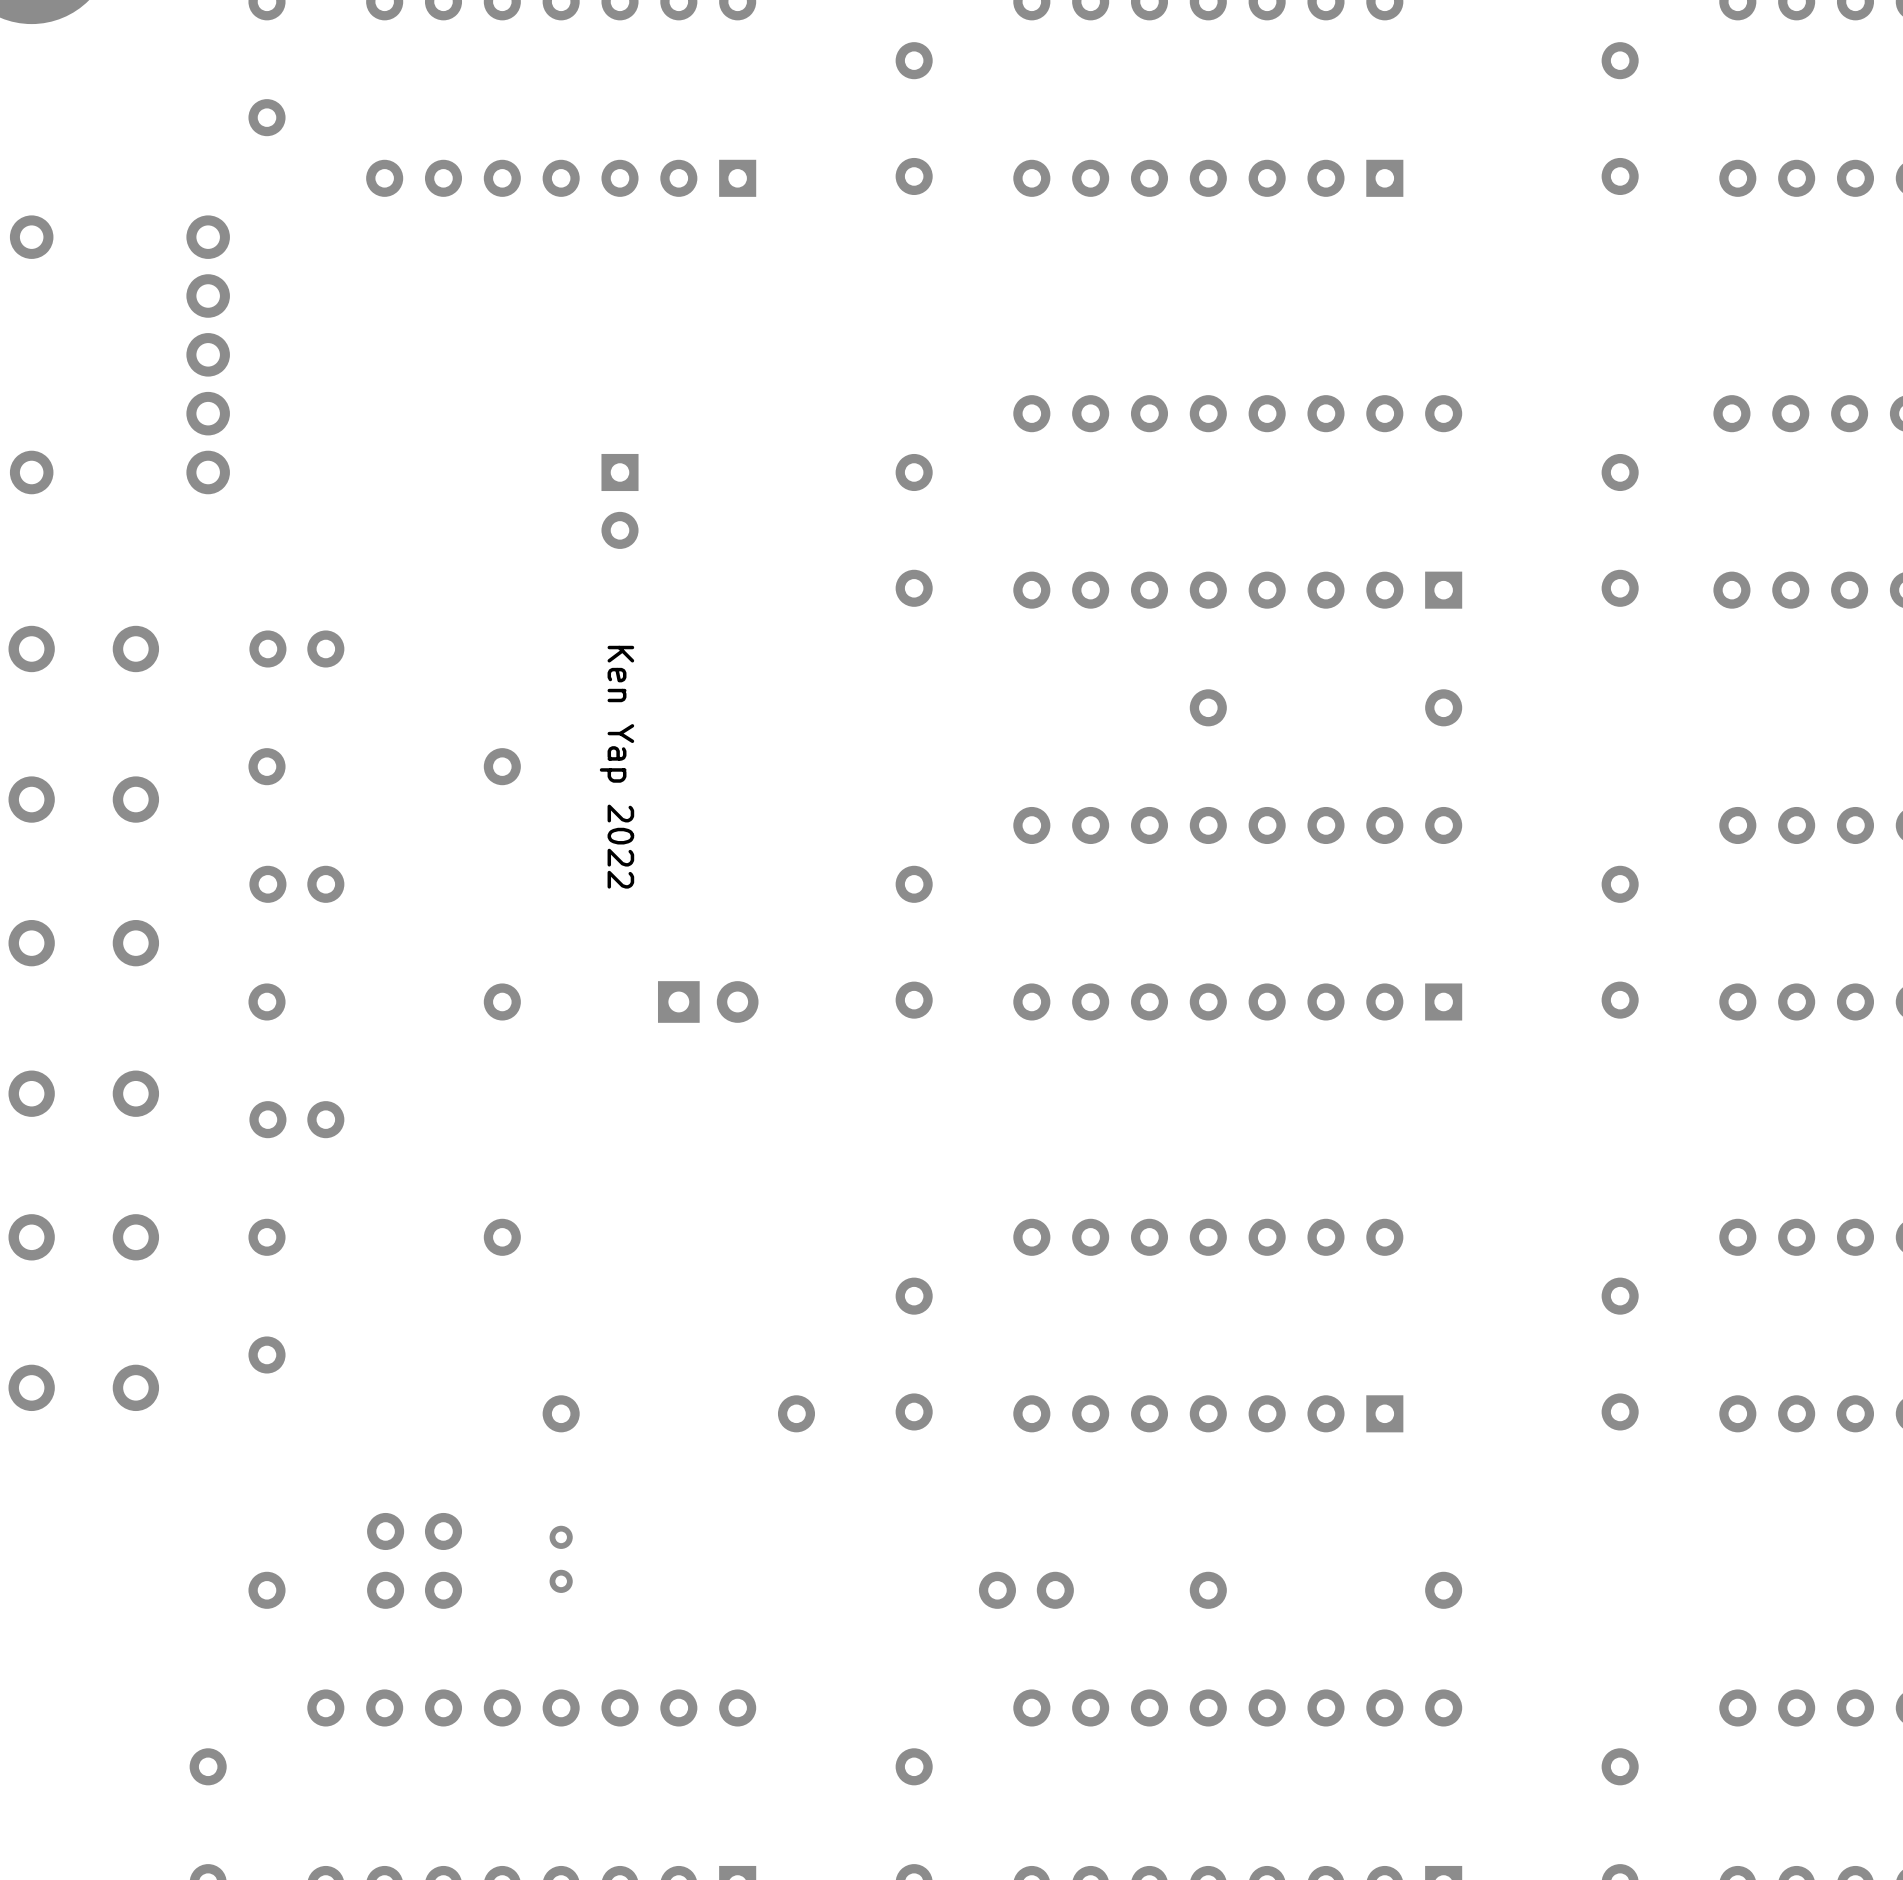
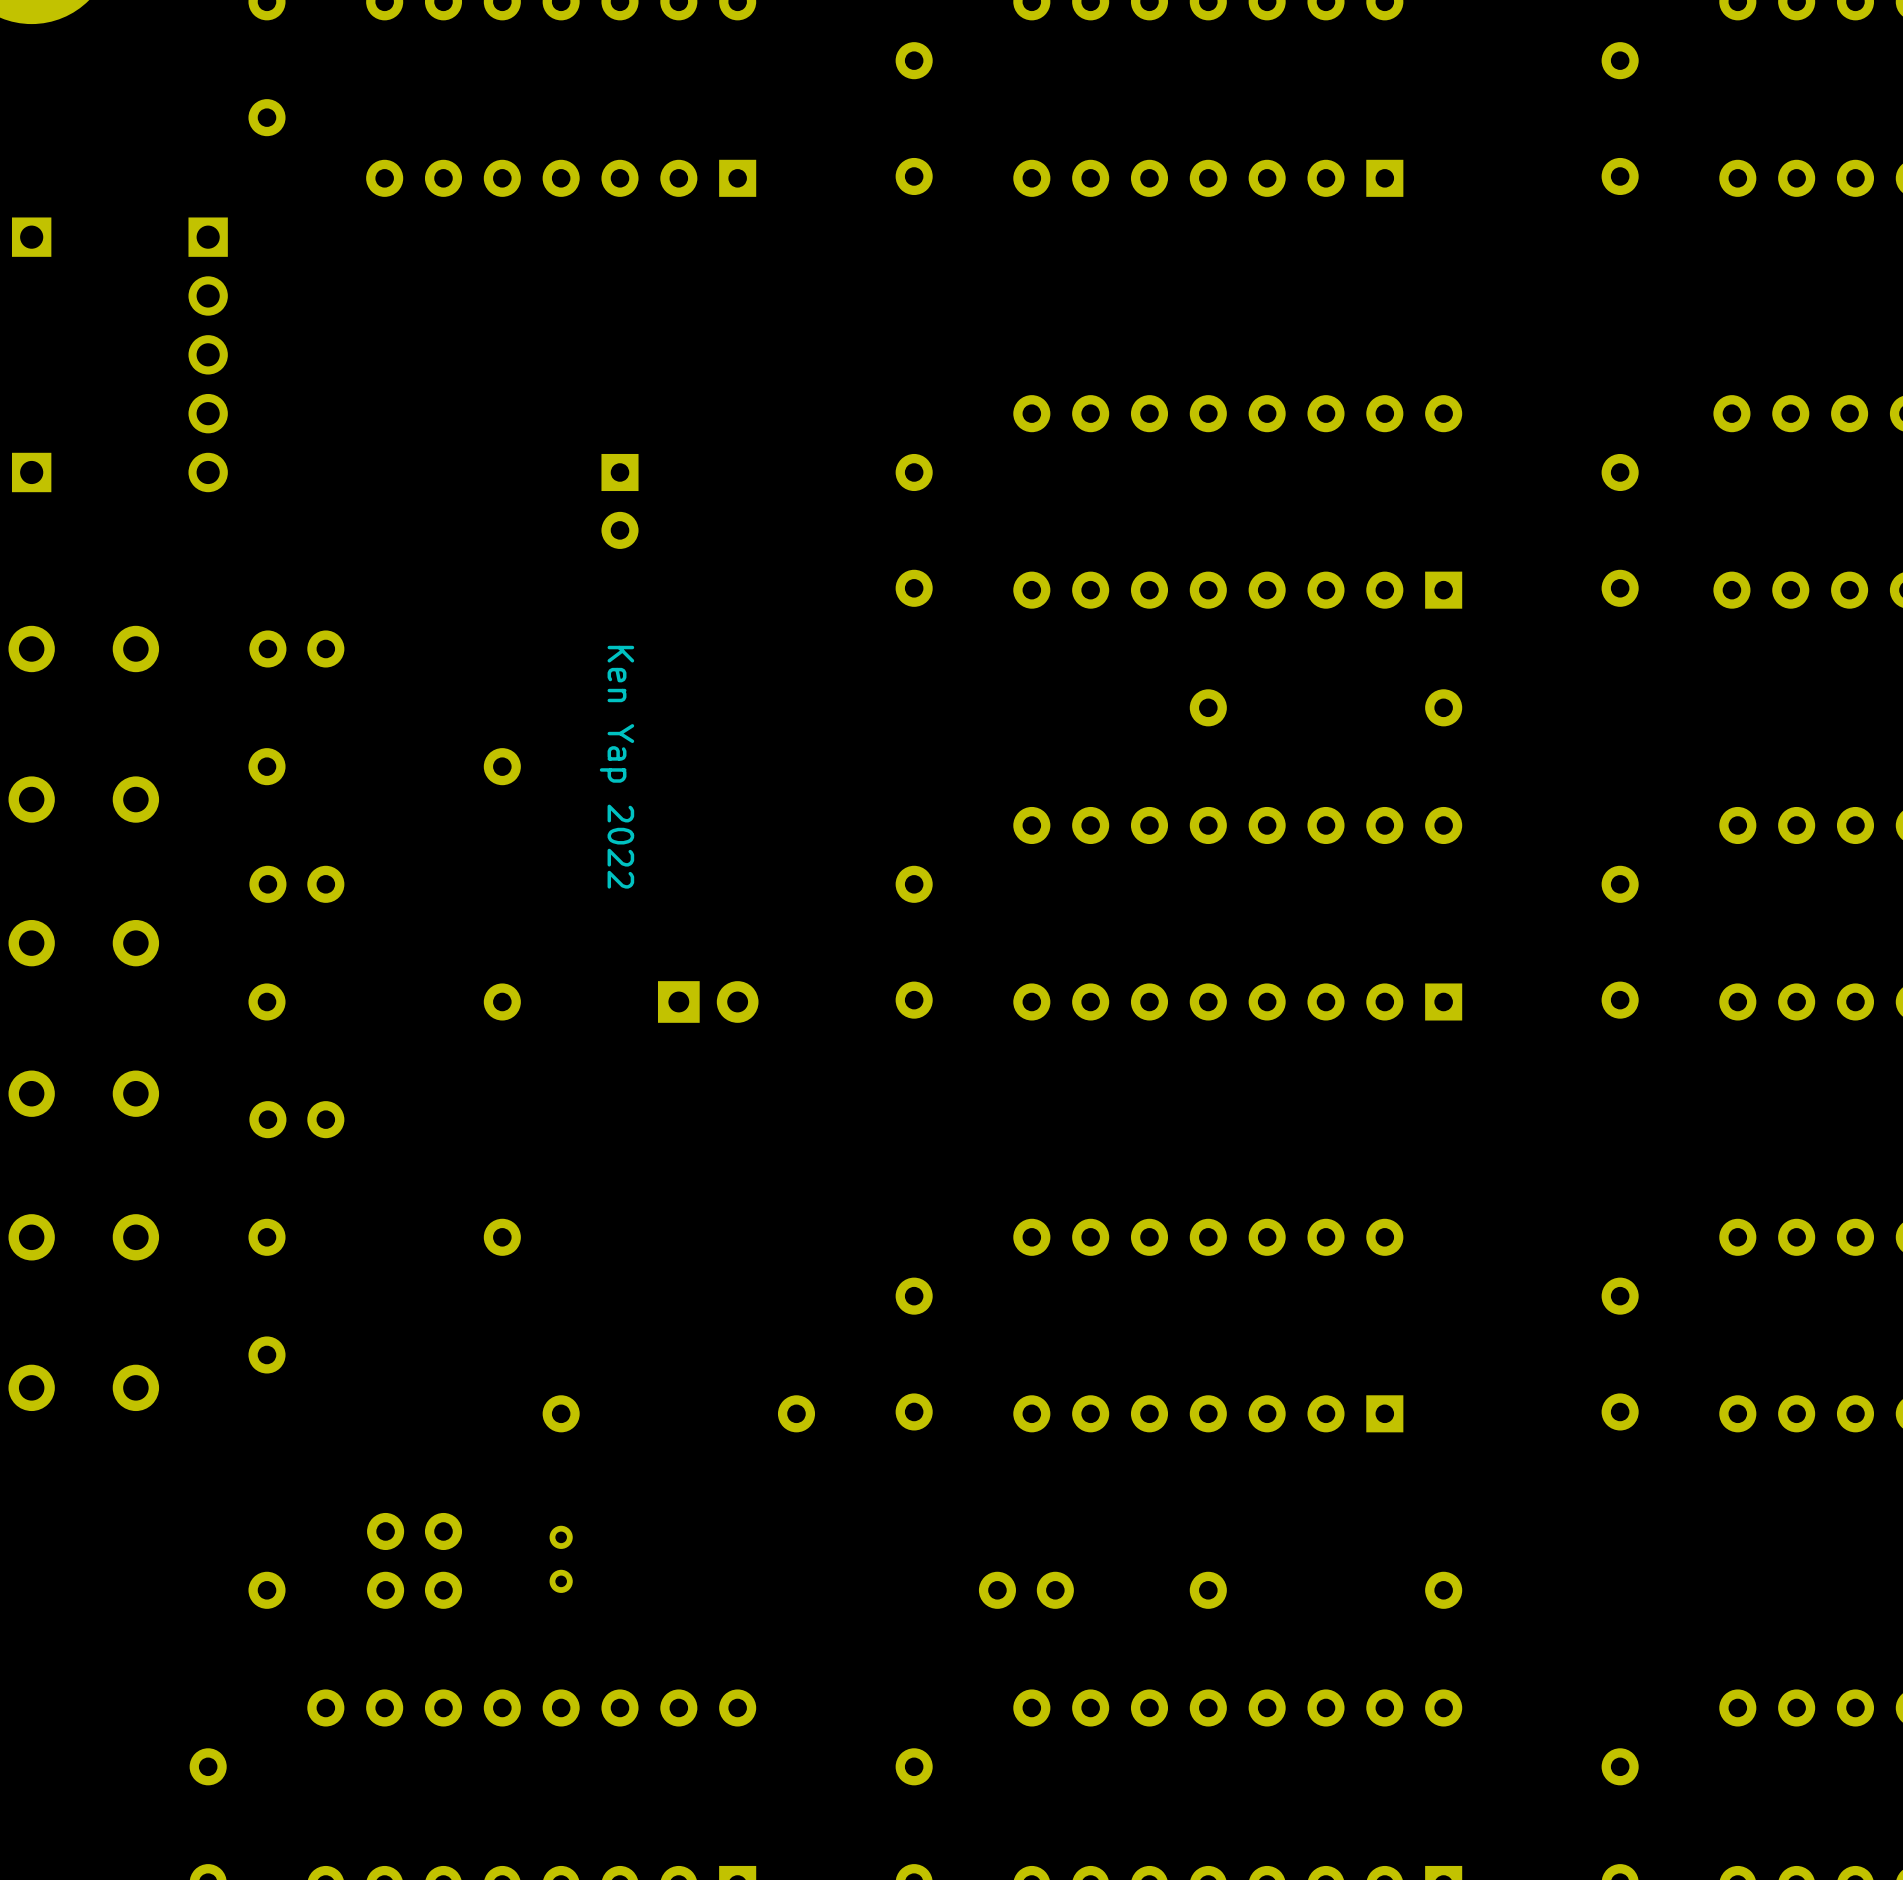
part footprint: [9, 215, 54, 259] -> [11, 217, 52, 257]
part footprint: [186, 215, 230, 495] -> [188, 217, 228, 493]
part footprint: [9, 450, 54, 495] -> [11, 452, 52, 493]

